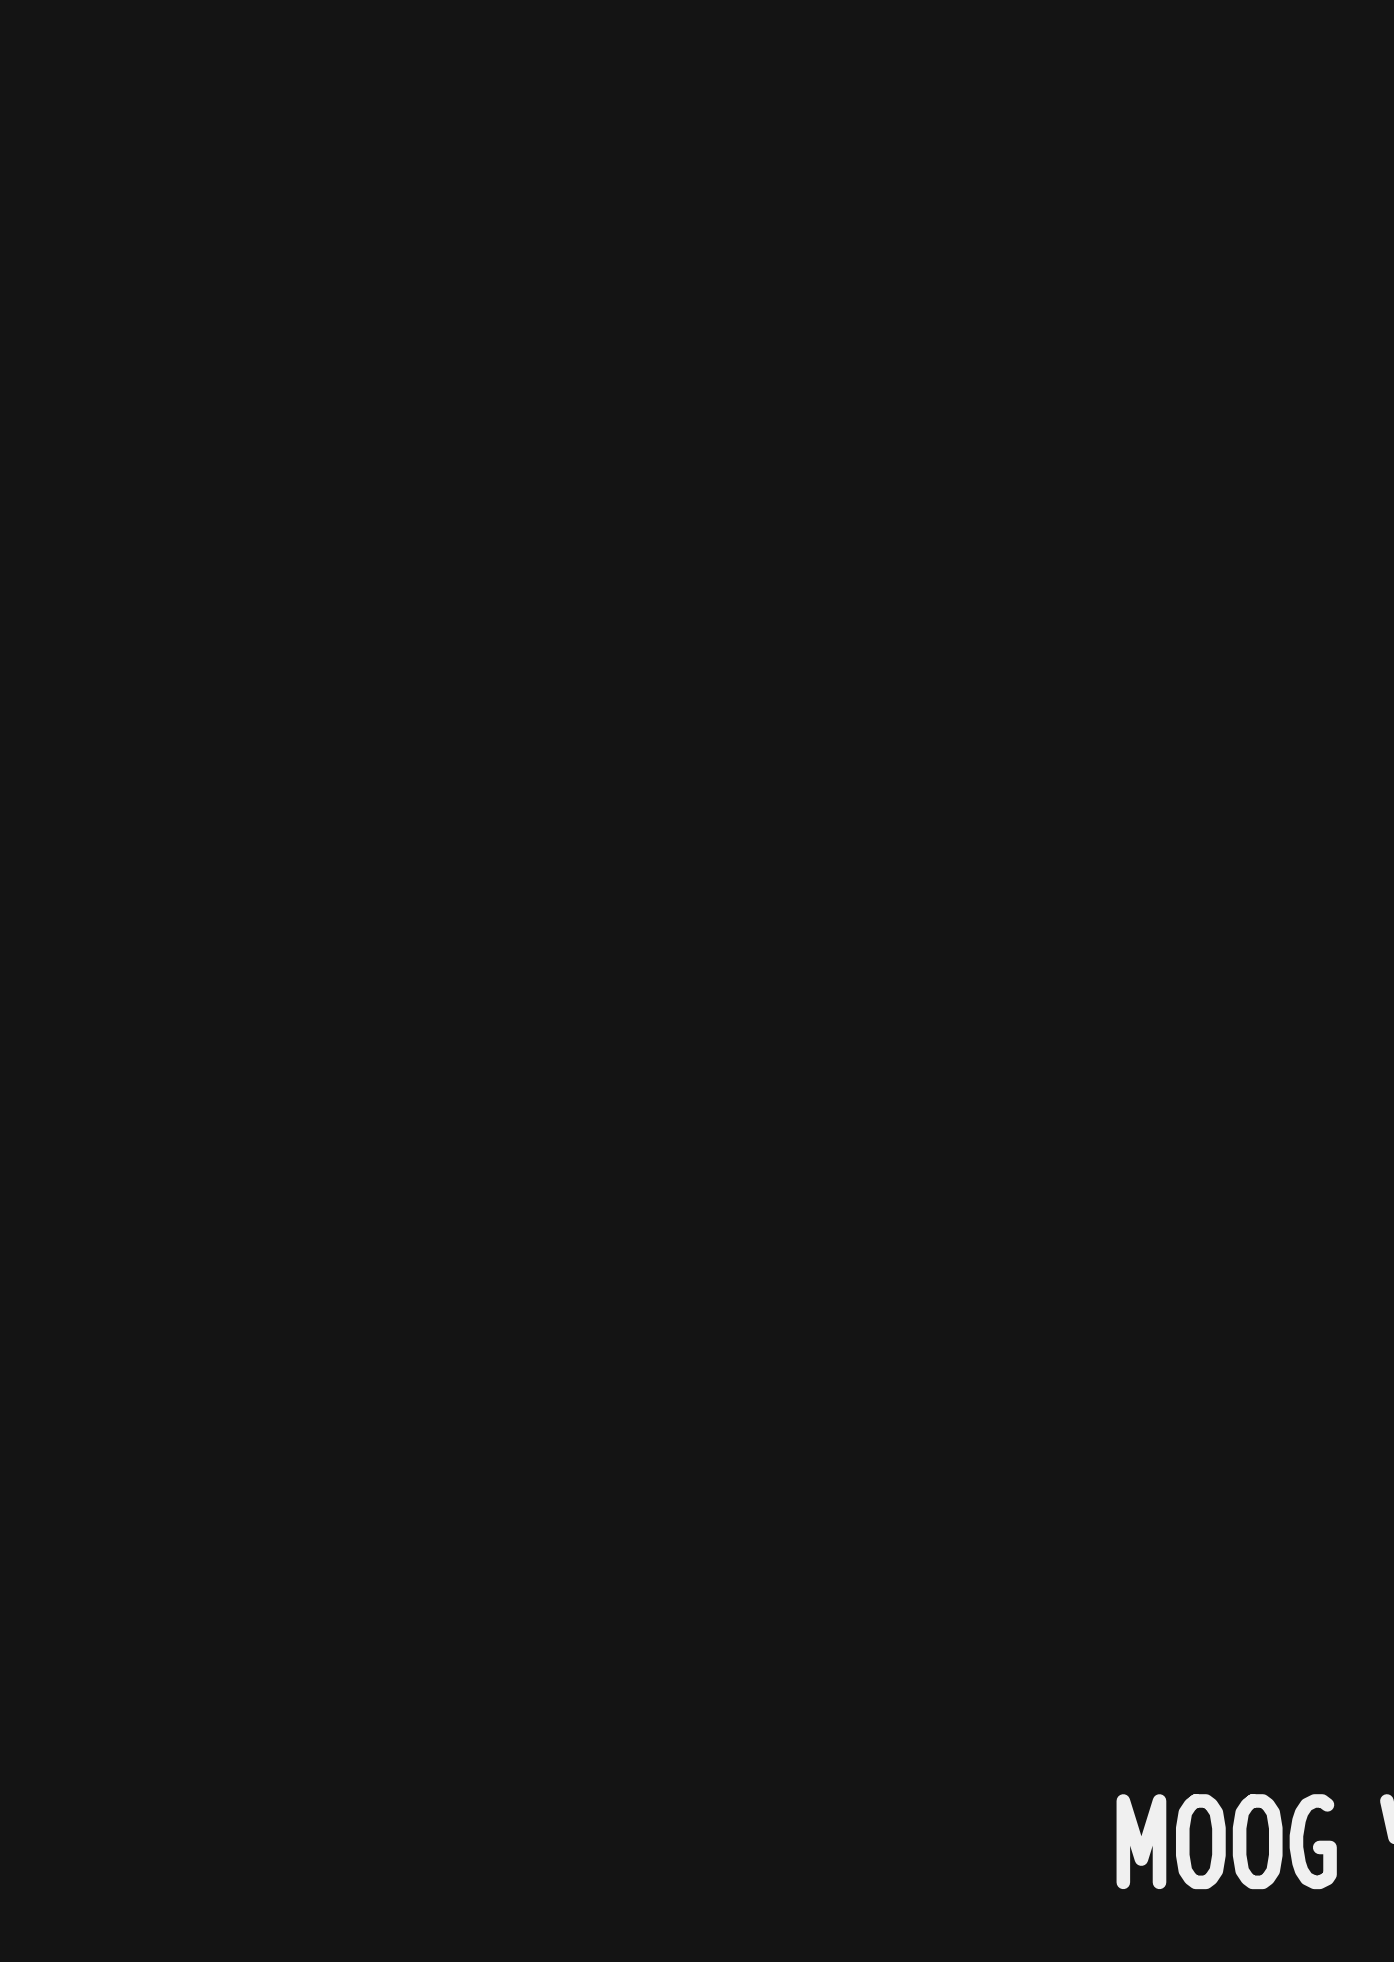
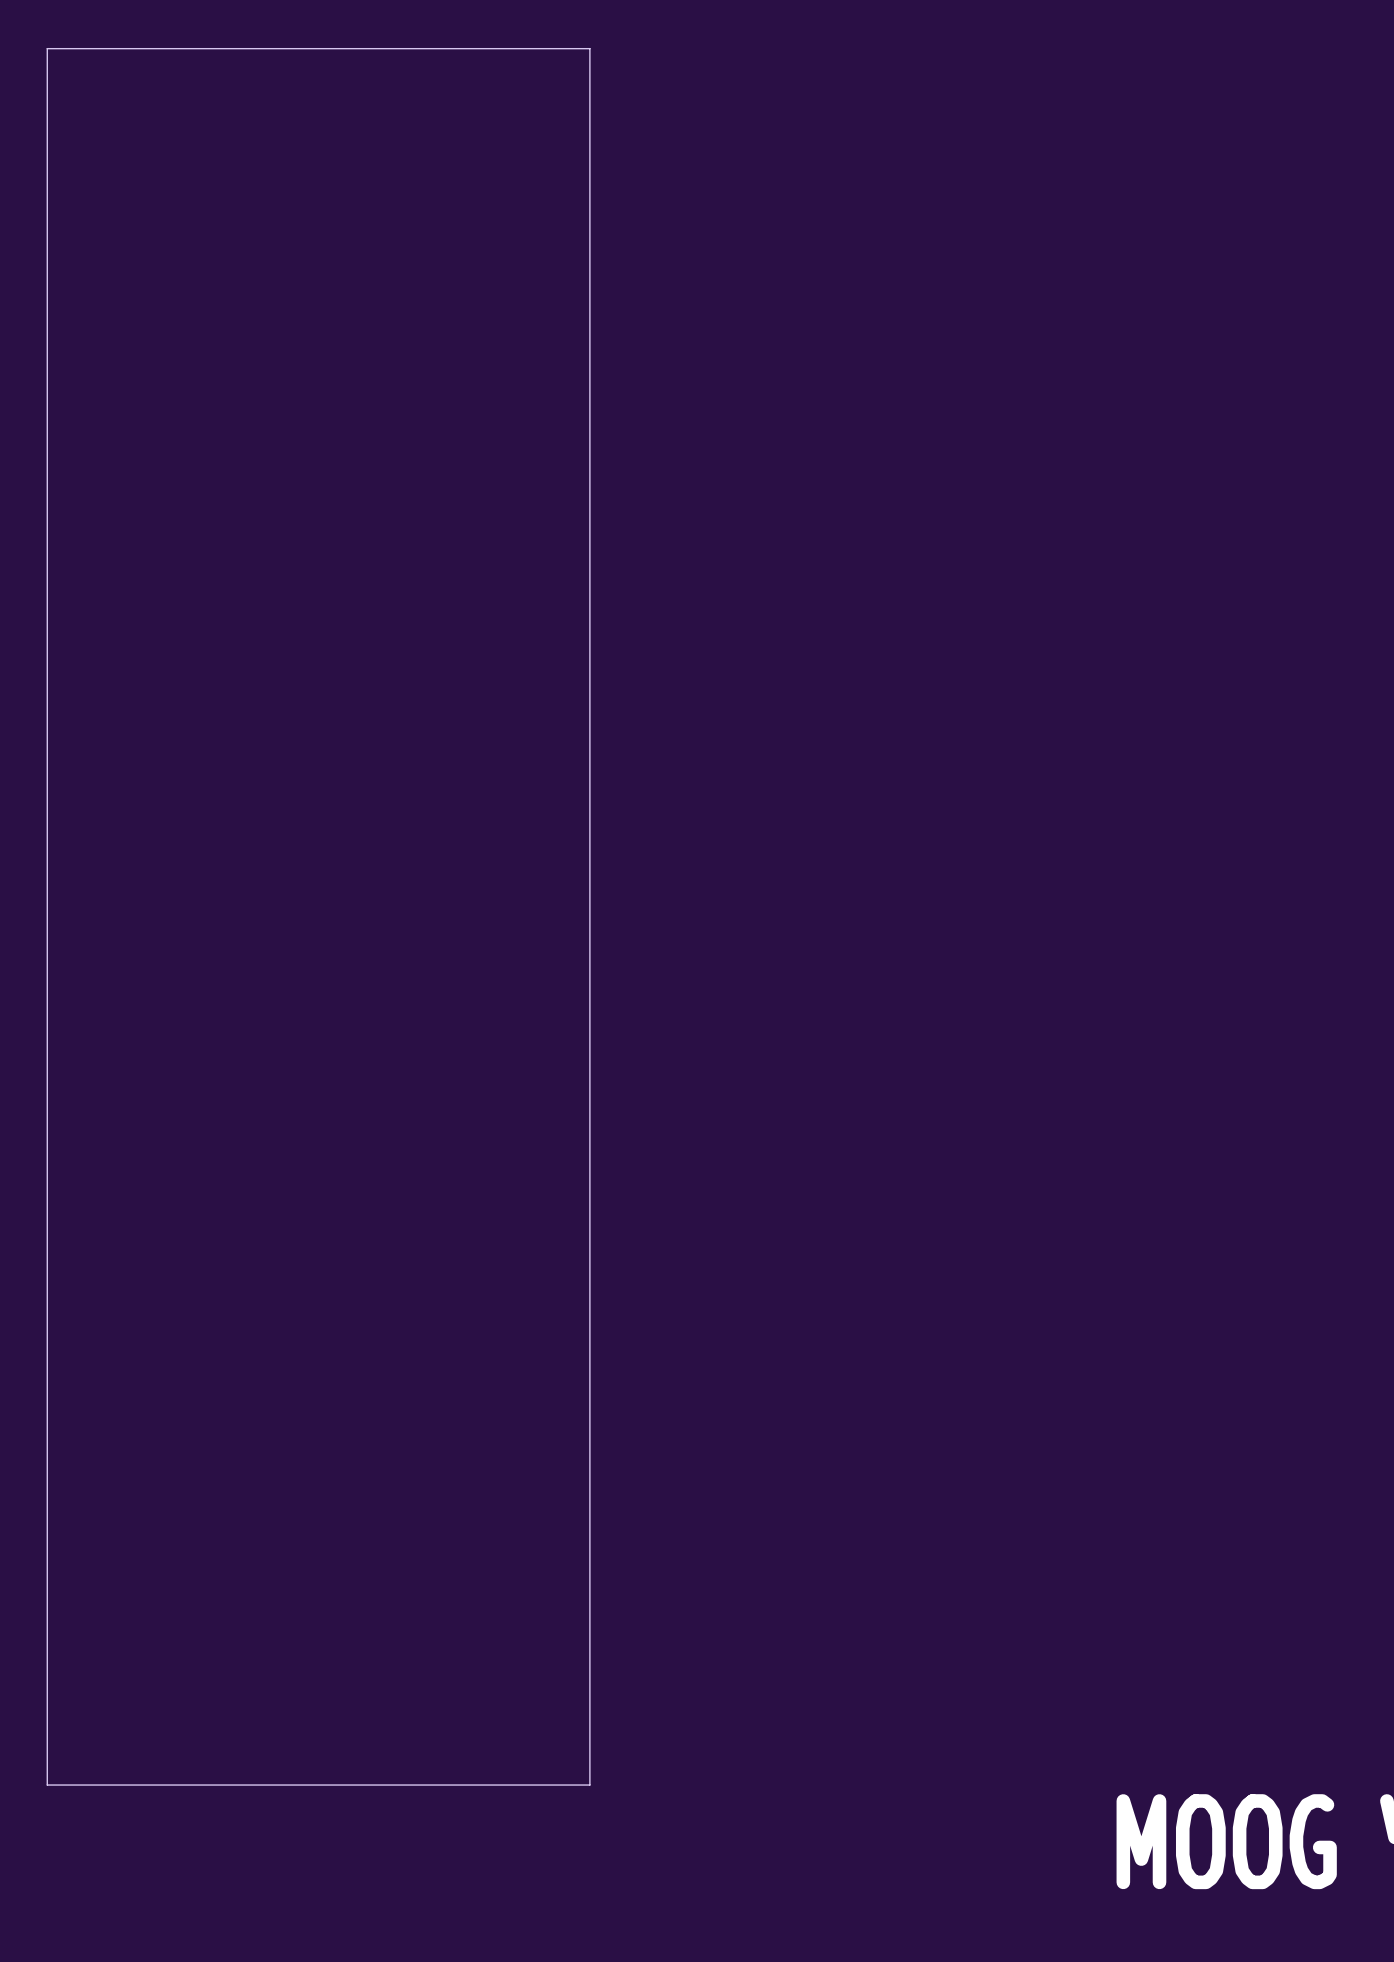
board edge: none -> (47, 48) (47, 1785) (589, 1785) (589, 48) (47, 48)

